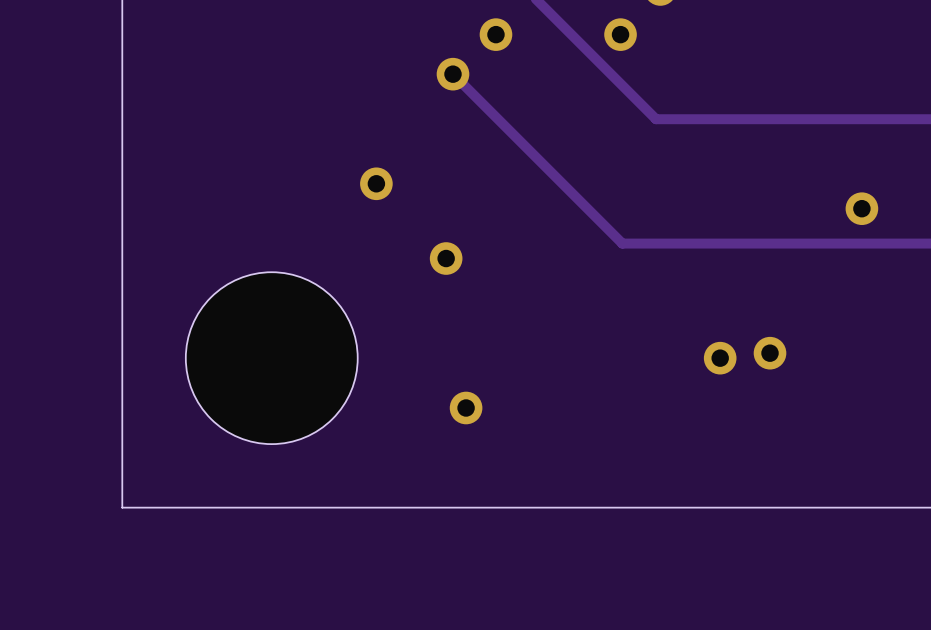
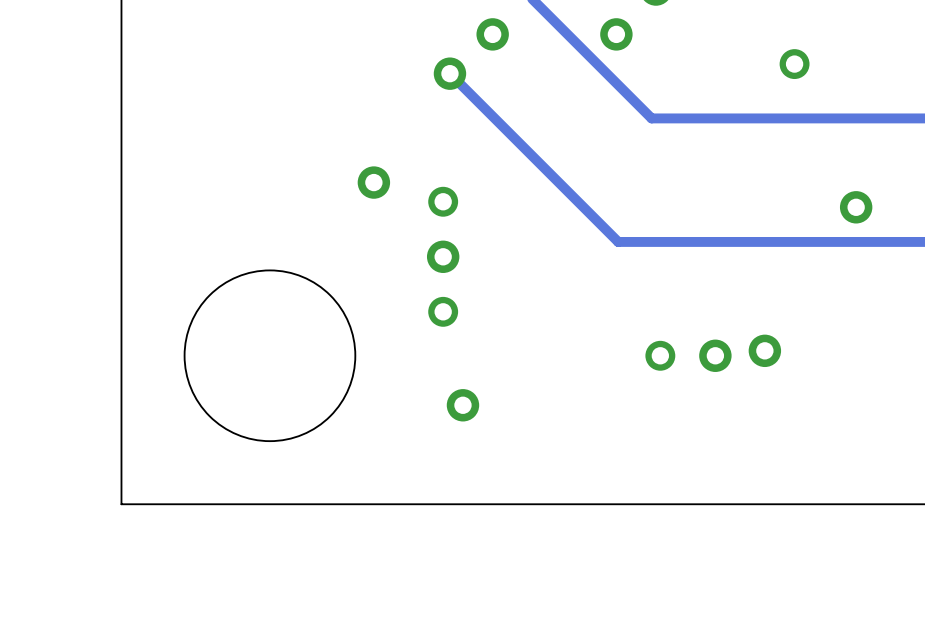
via: none -> (794, 64)
via: none -> (443, 201)
via: none -> (443, 311)
via: none -> (660, 355)

